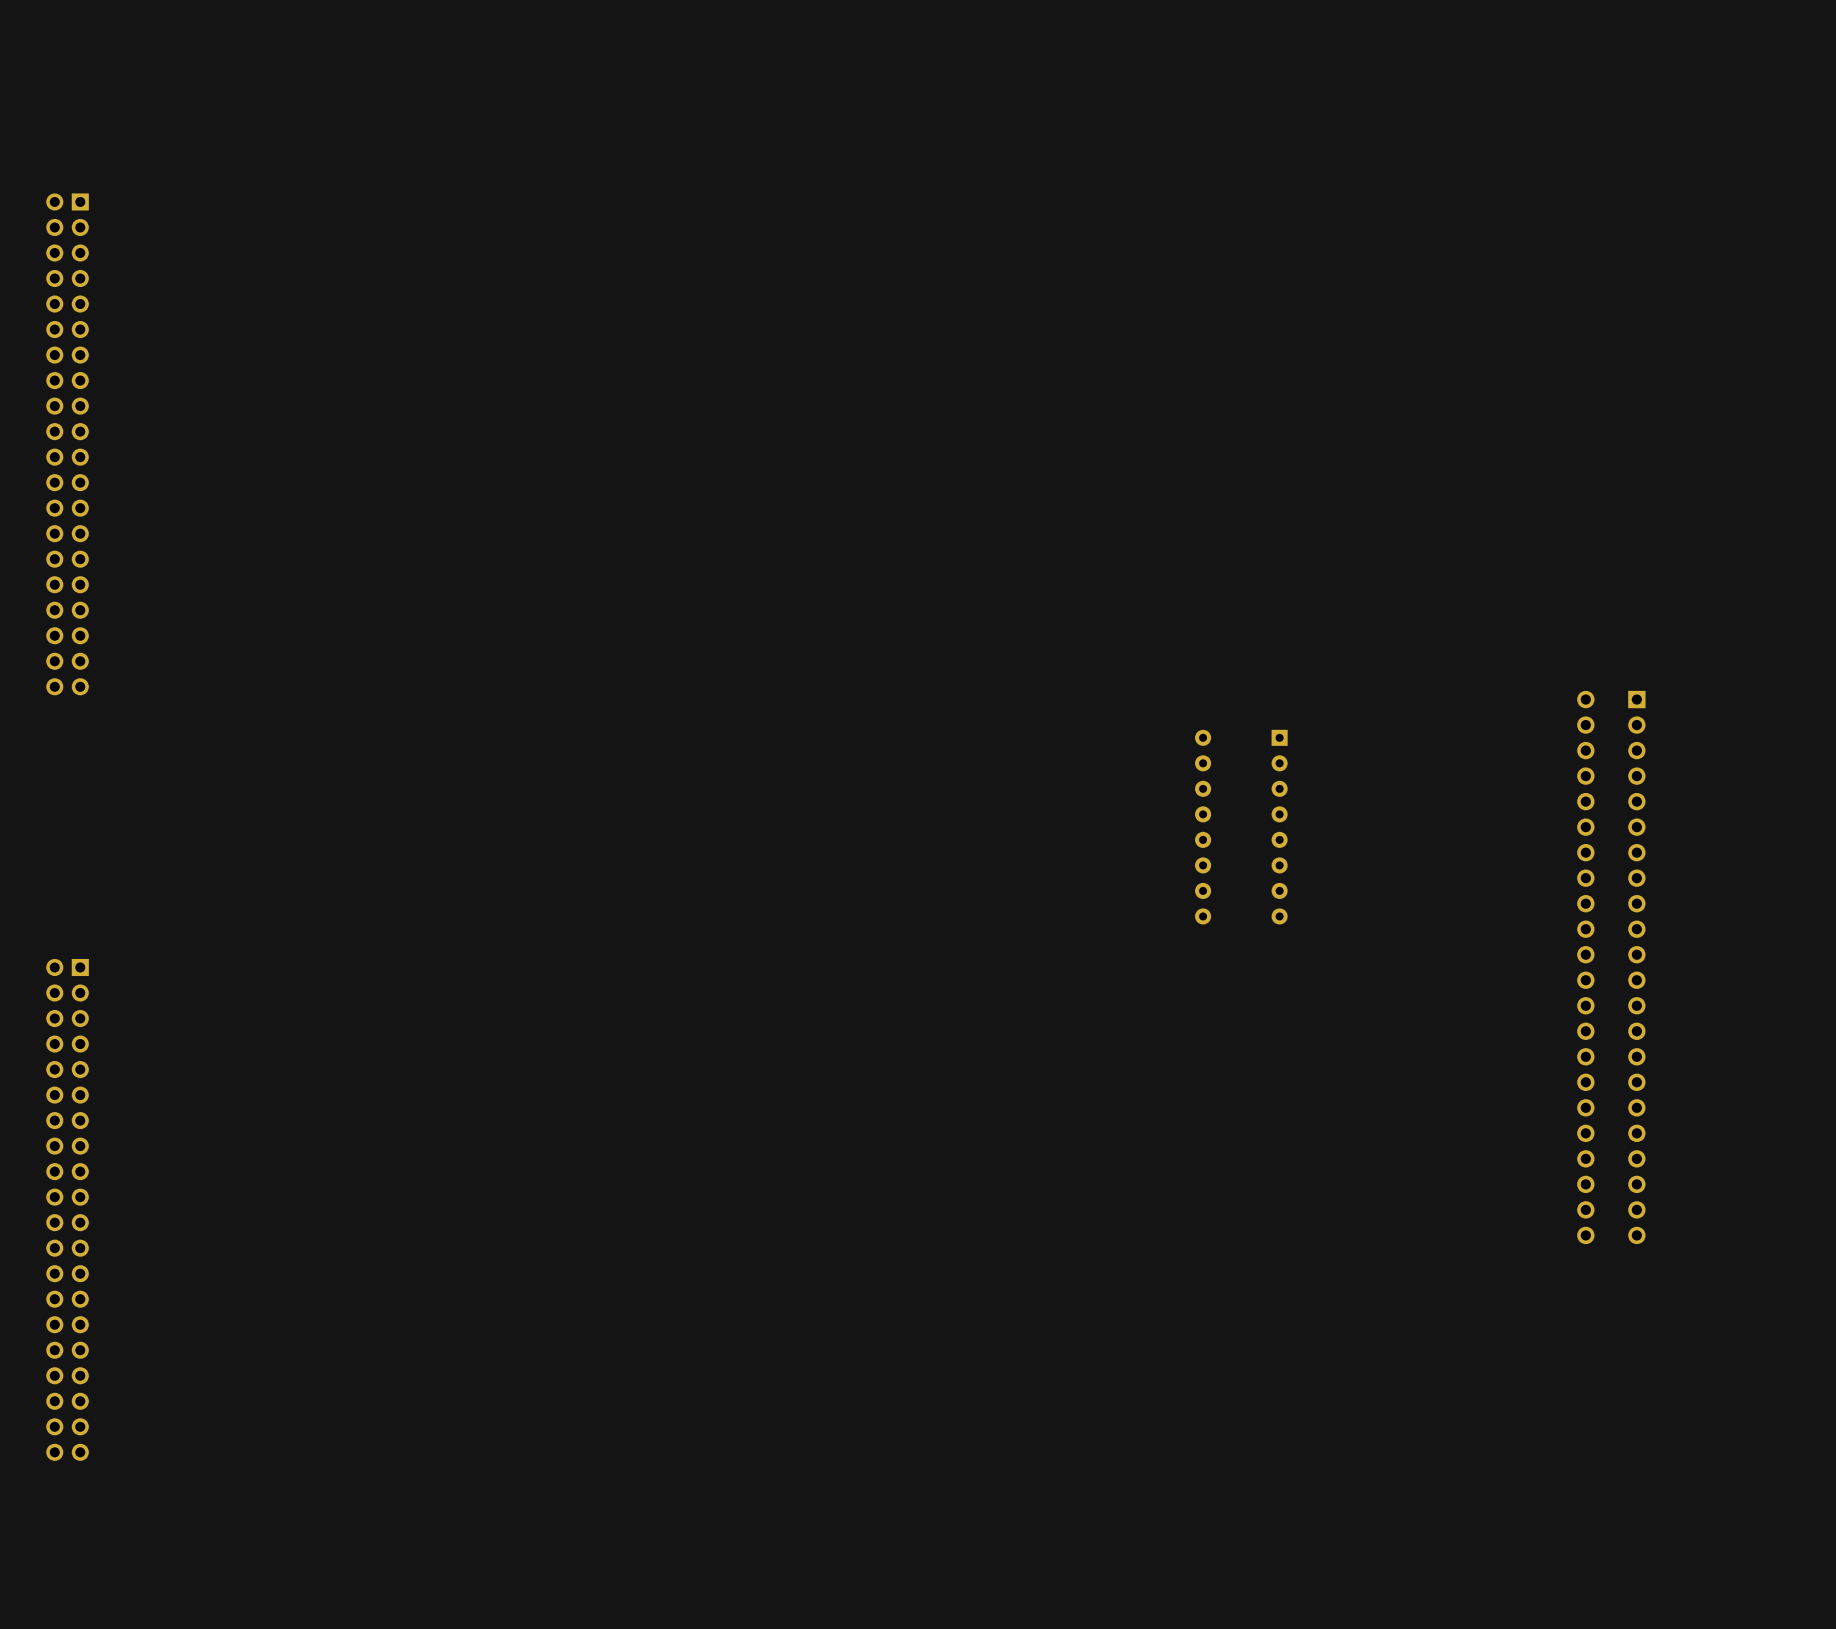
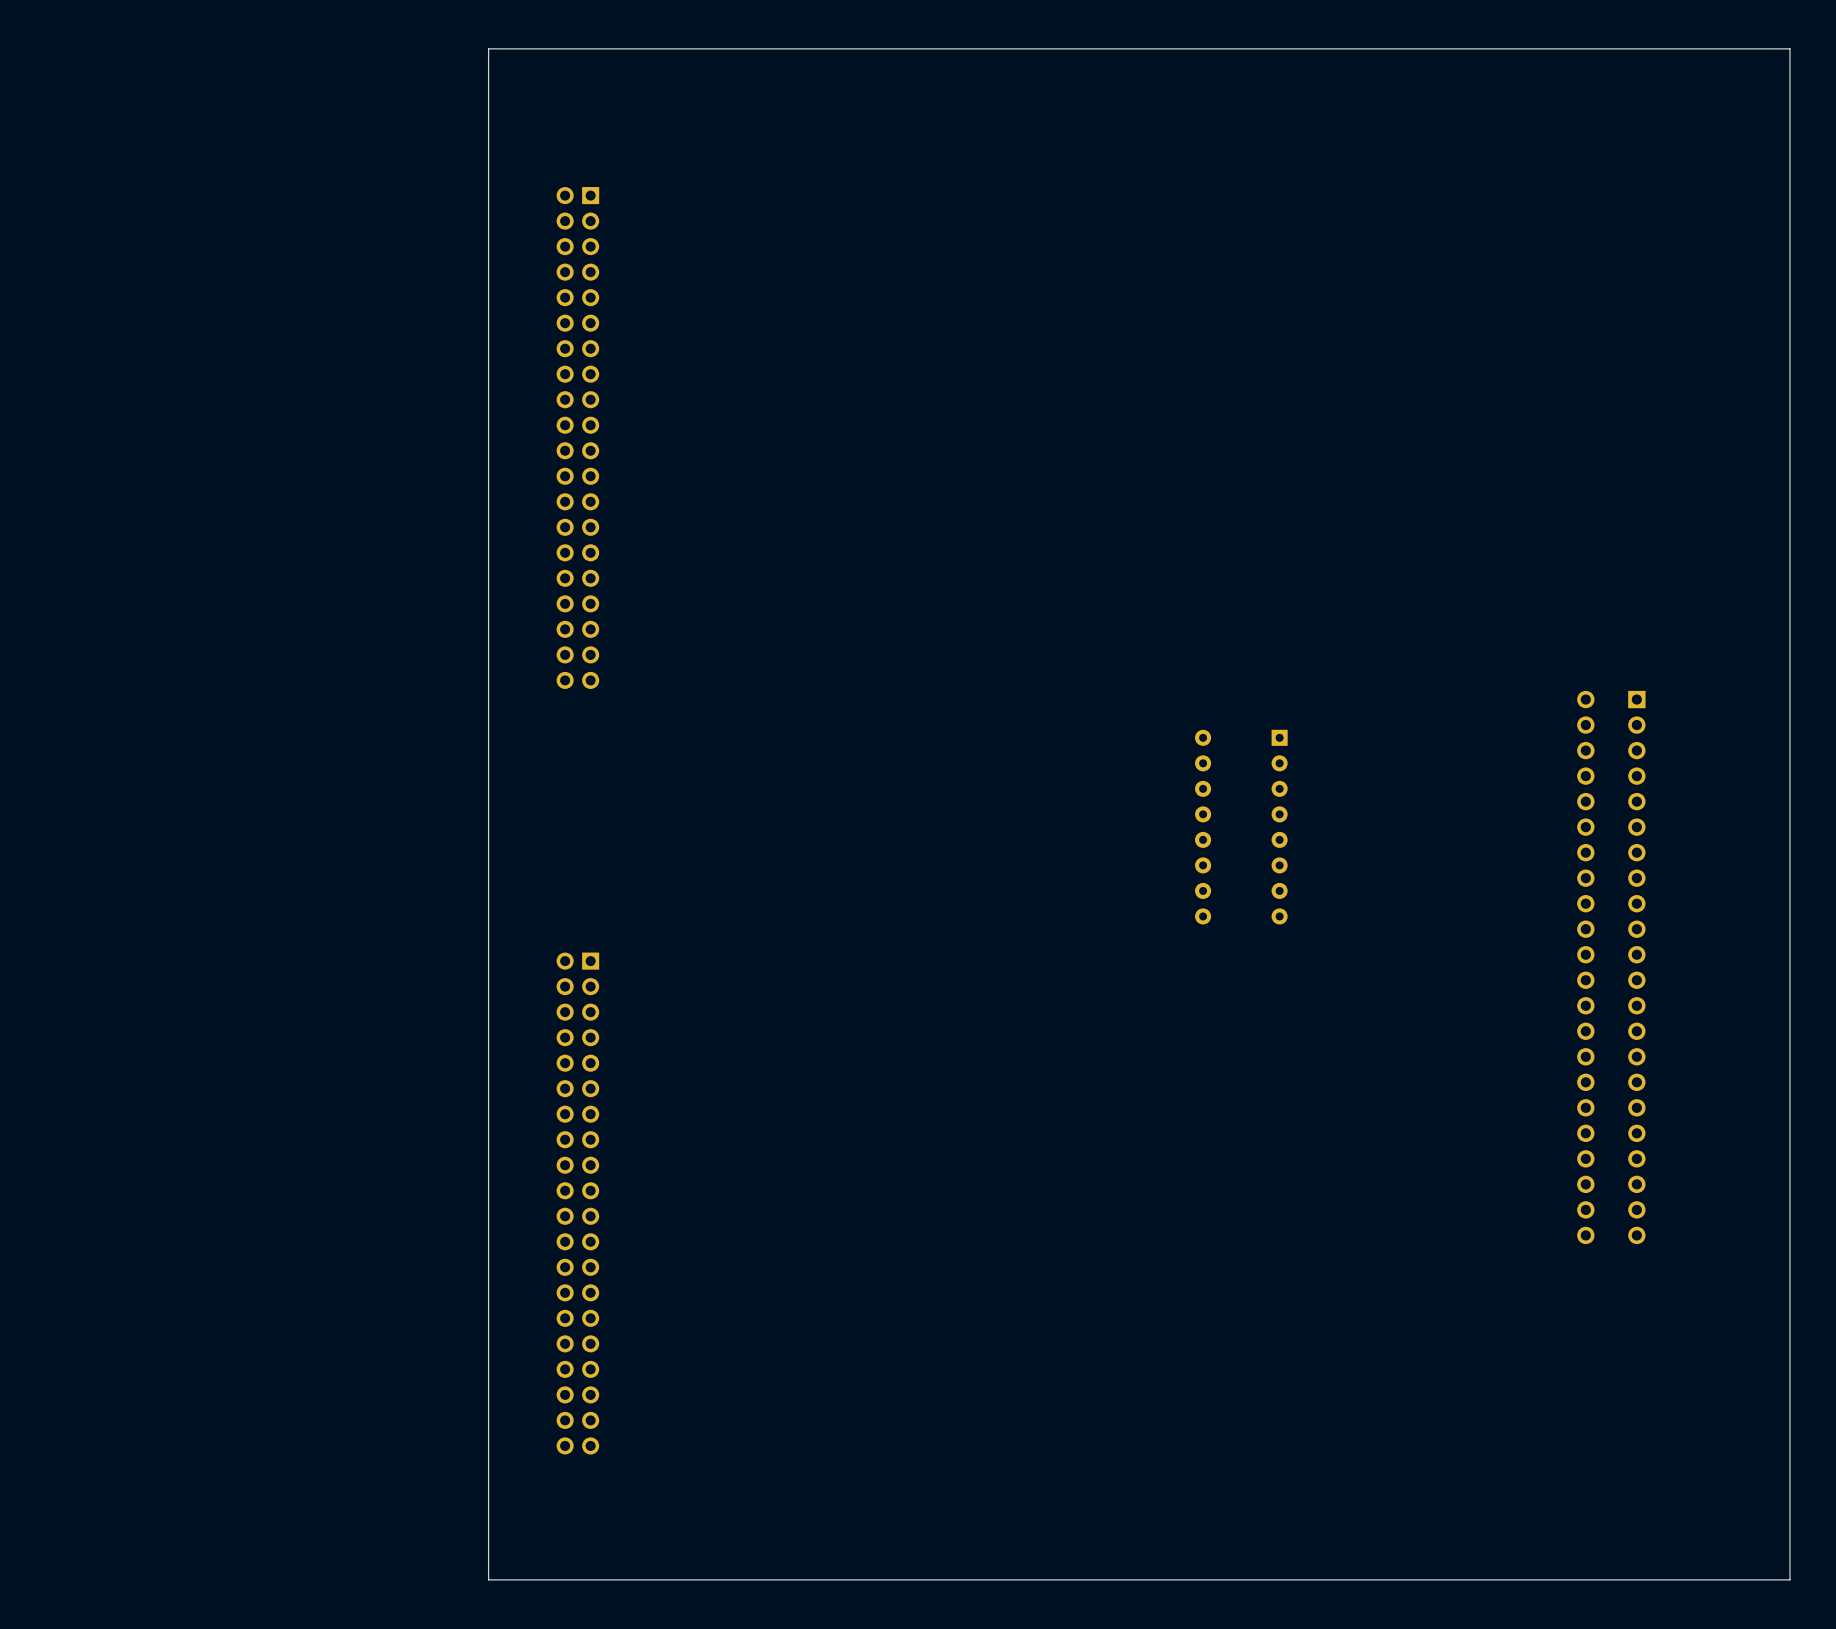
board edge: none -> (1789, 48) (488, 48) (488, 1579) (1789, 1579) (1789, 48)
part: none -> (577, 438)
part: (67, 444) -> none
part: none -> (577, 1203)
part: (67, 1209) -> none

